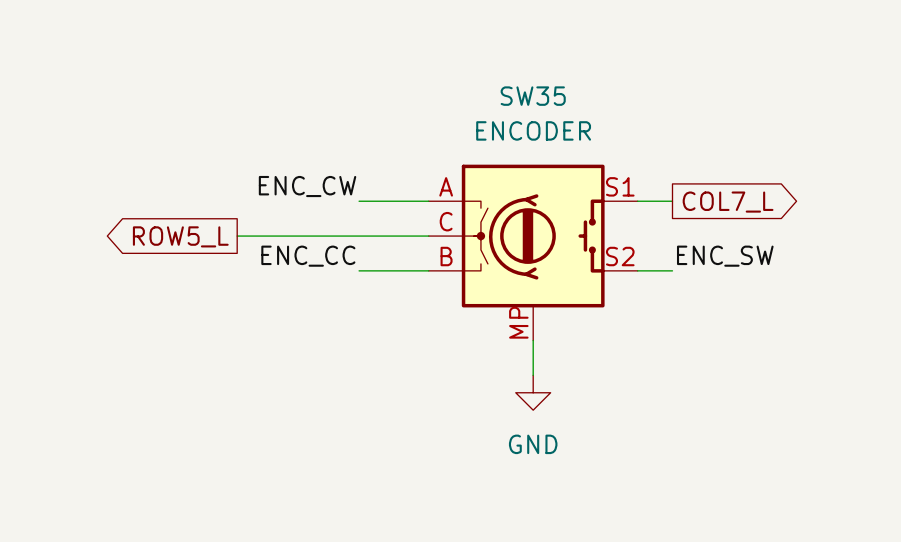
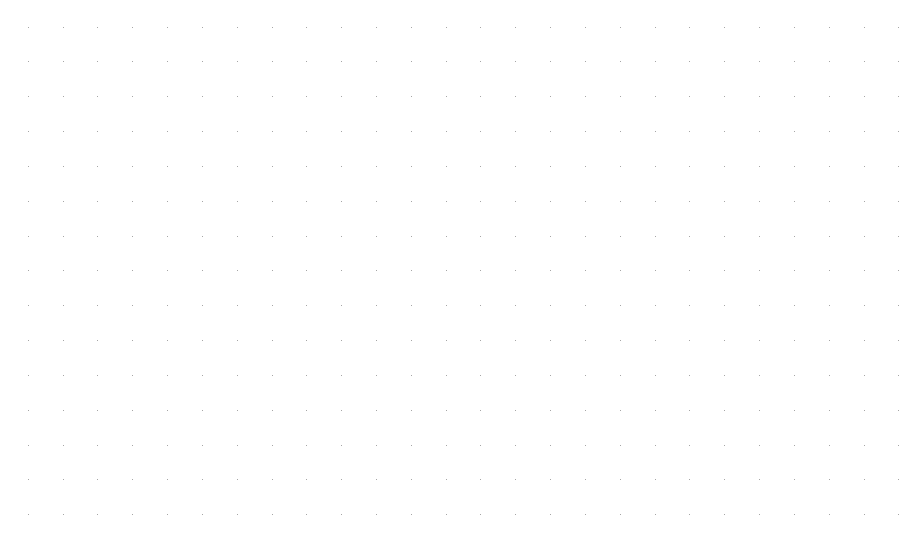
label: ENC_CW (307, 186) -> none
wire: (359, 201) (428, 201) -> none
wire: (637, 201) (672, 201) -> none
global label: COL7_L (728, 202) -> none
global label: ROW5_L (180, 236) -> none
wire: (237, 236) (428, 236) -> none
SW35: ENCODER (533, 252) -> none
label: ENC_CC (308, 256) -> none
label: ENC_SW (725, 256) -> none
wire: (359, 270) (428, 270) -> none
wire: (637, 270) (672, 270) -> none
wire: (533, 340) (533, 375) -> none
power symbol: GND (533, 392) -> none

